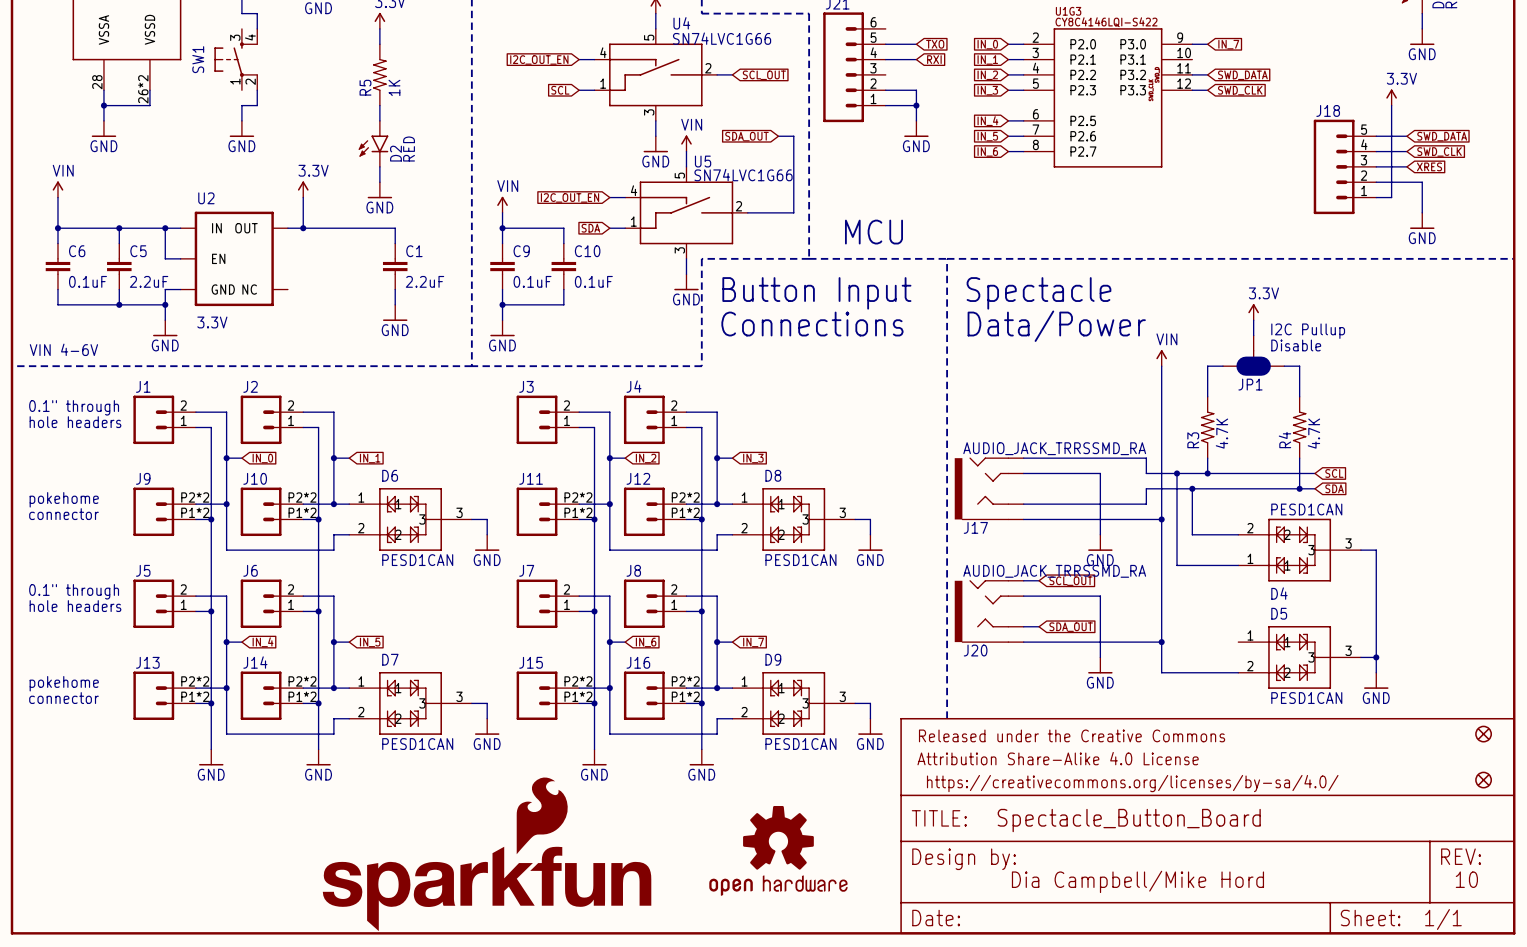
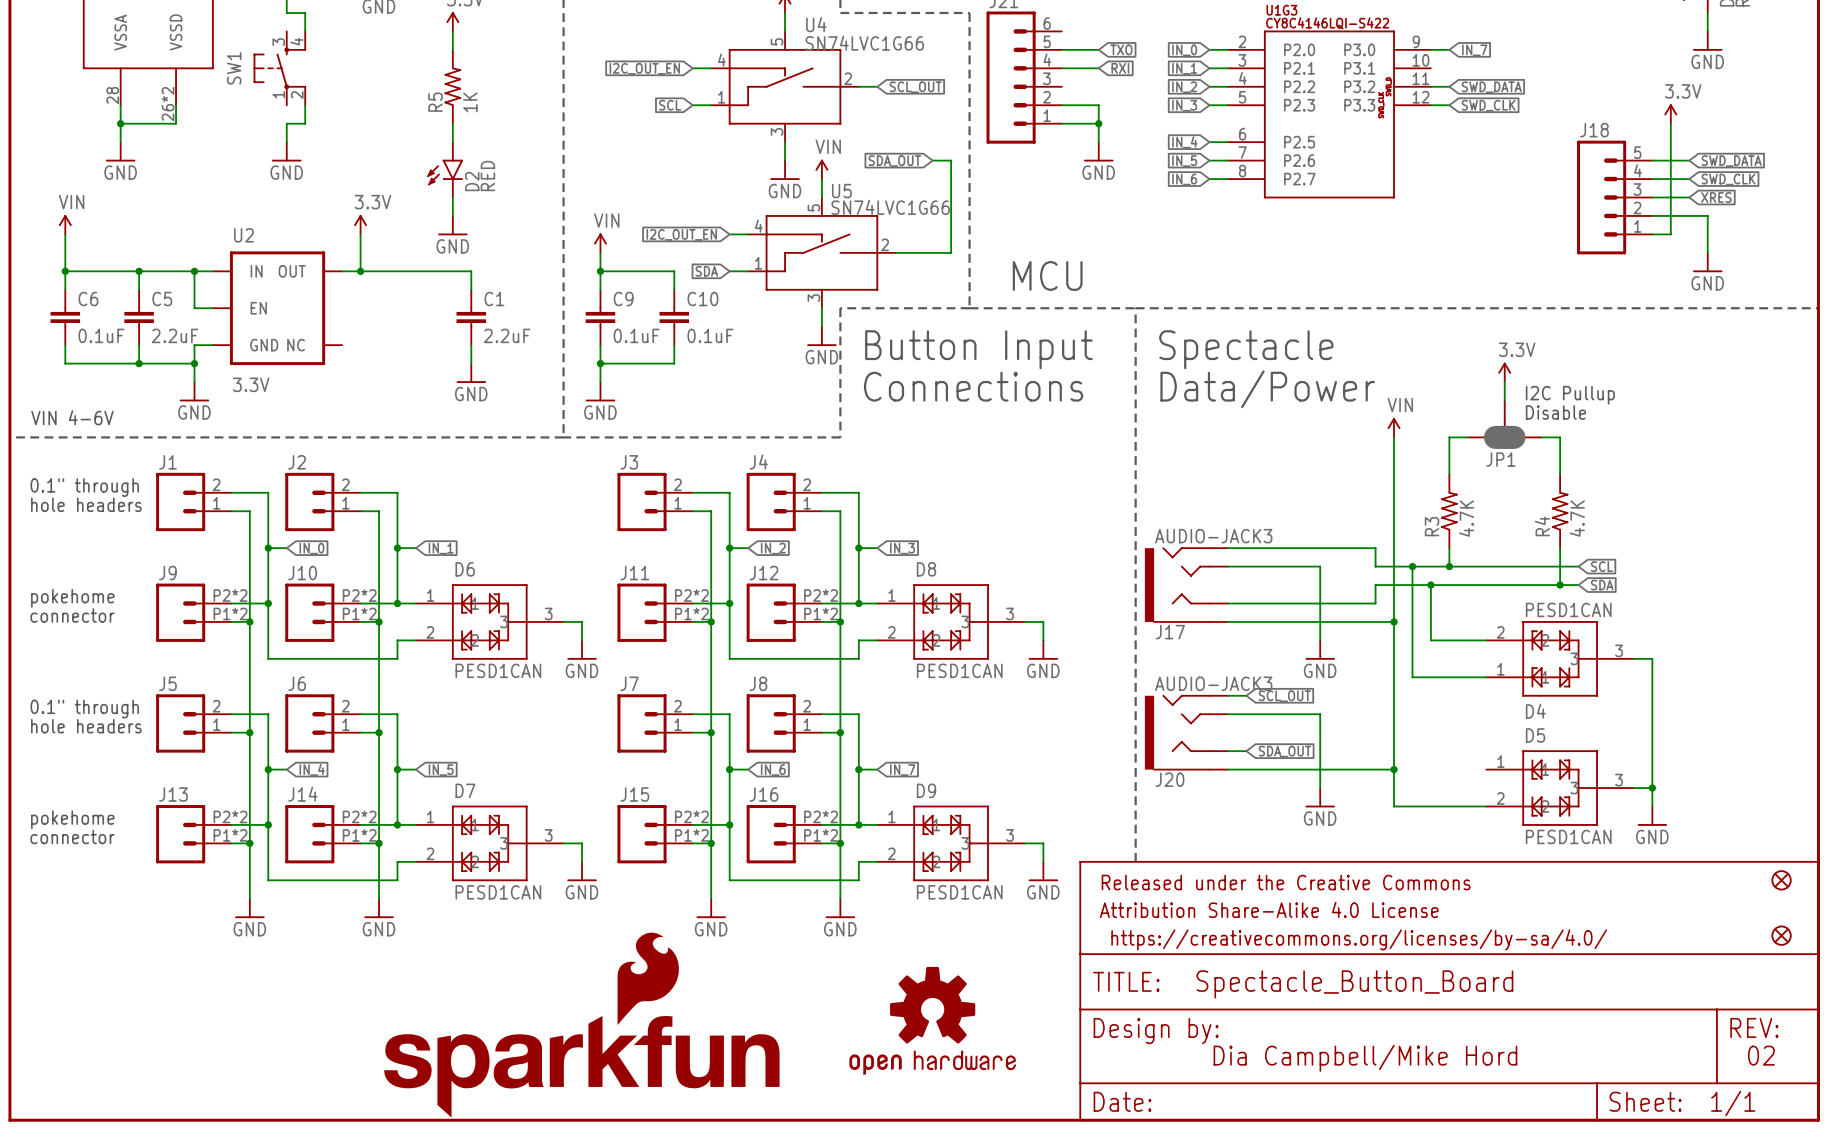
J17 value: AUDIO_JACK_TRRSSMD_RA (1054, 448) -> AUDIO-JACK3 (1213, 536)
J20 value: AUDIO_JACK_TRRSSMD_RA (1054, 571) -> AUDIO-JACK3 (1213, 683)
text: 10 (1466, 879) -> 02 (1761, 1055)

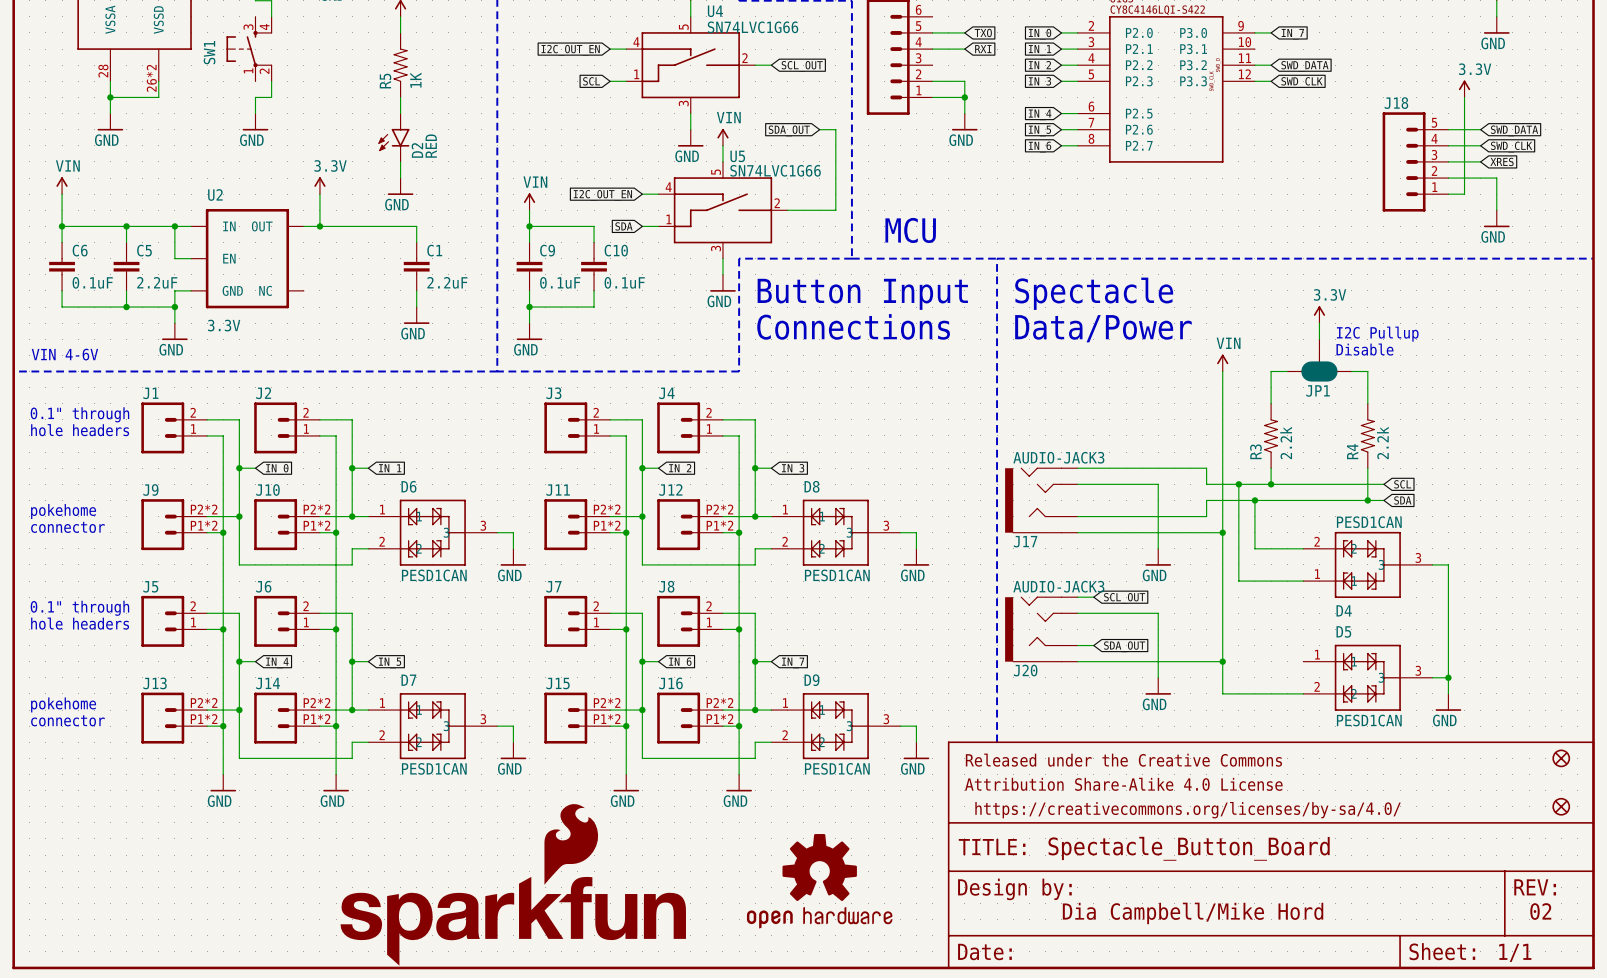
R3 value: 4.7K (1466, 518) -> 2.2k (1286, 442)
R4 value: 4.7K (1577, 518) -> 2.2k (1382, 442)

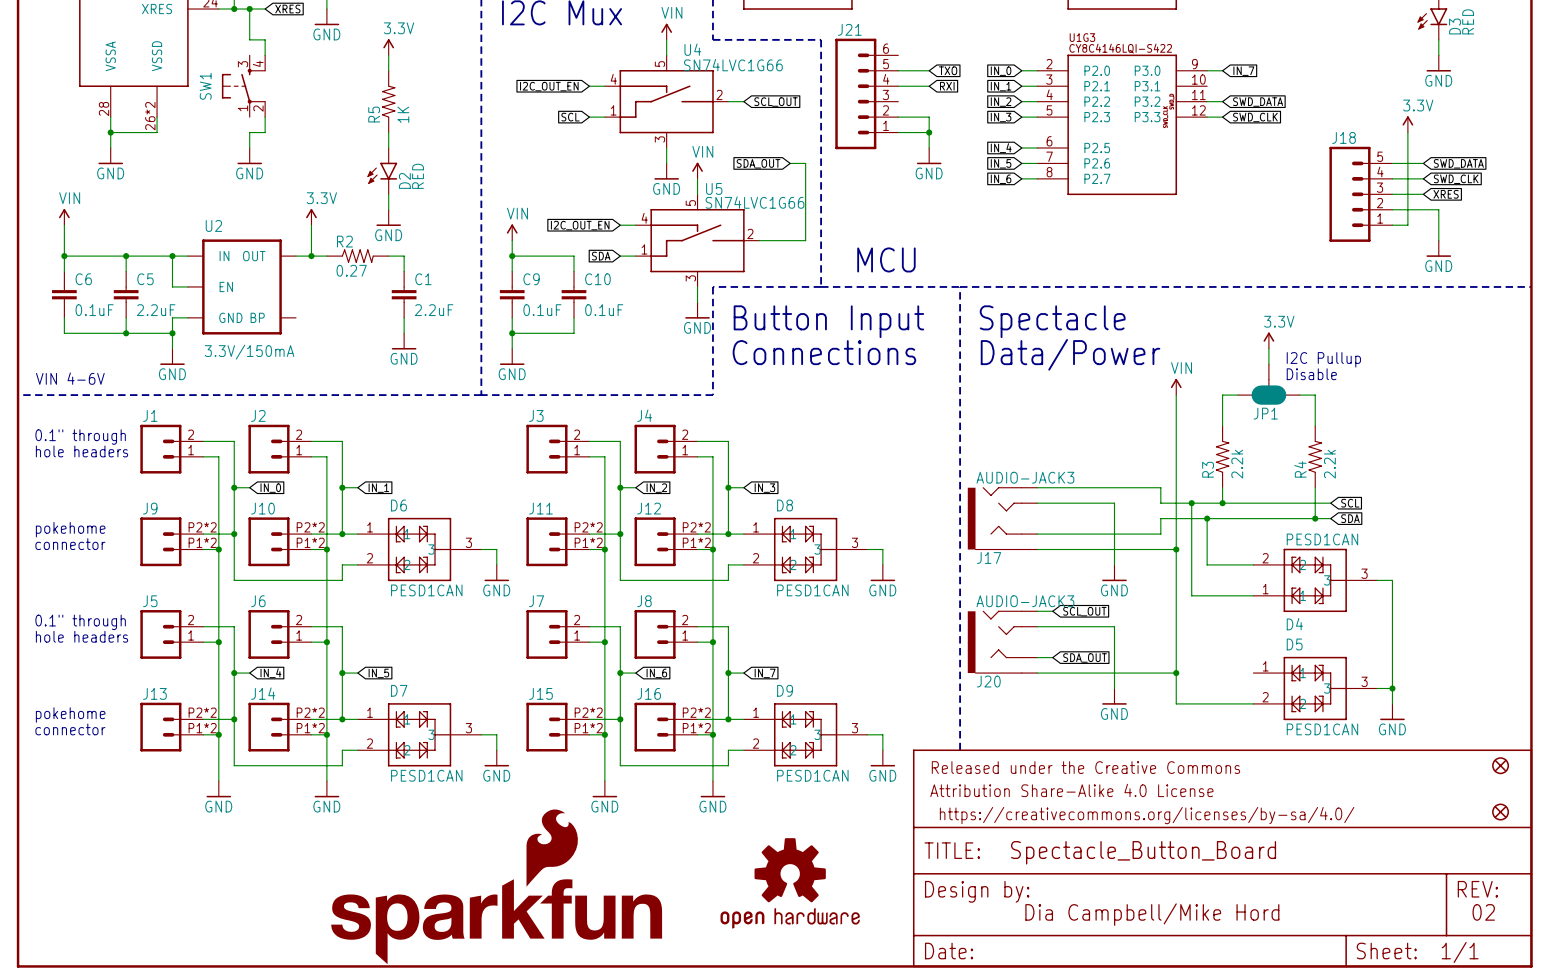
R2: none -> 0.27 (357, 256)
U2 pin name: NC (265, 290) -> BP (257, 317)
U2 value: 3.3V (224, 325) -> 3.3V/150mA (249, 352)

